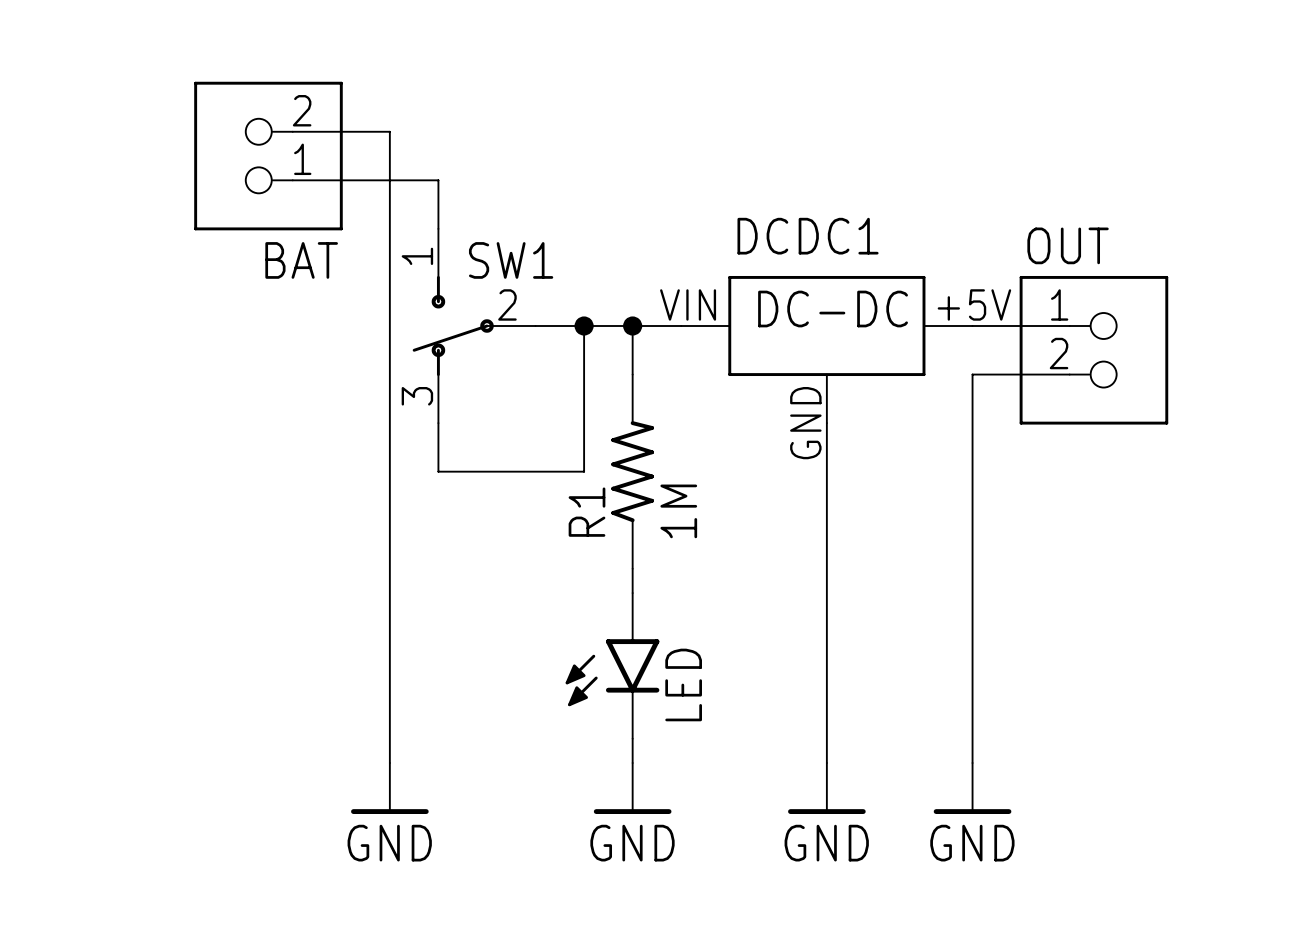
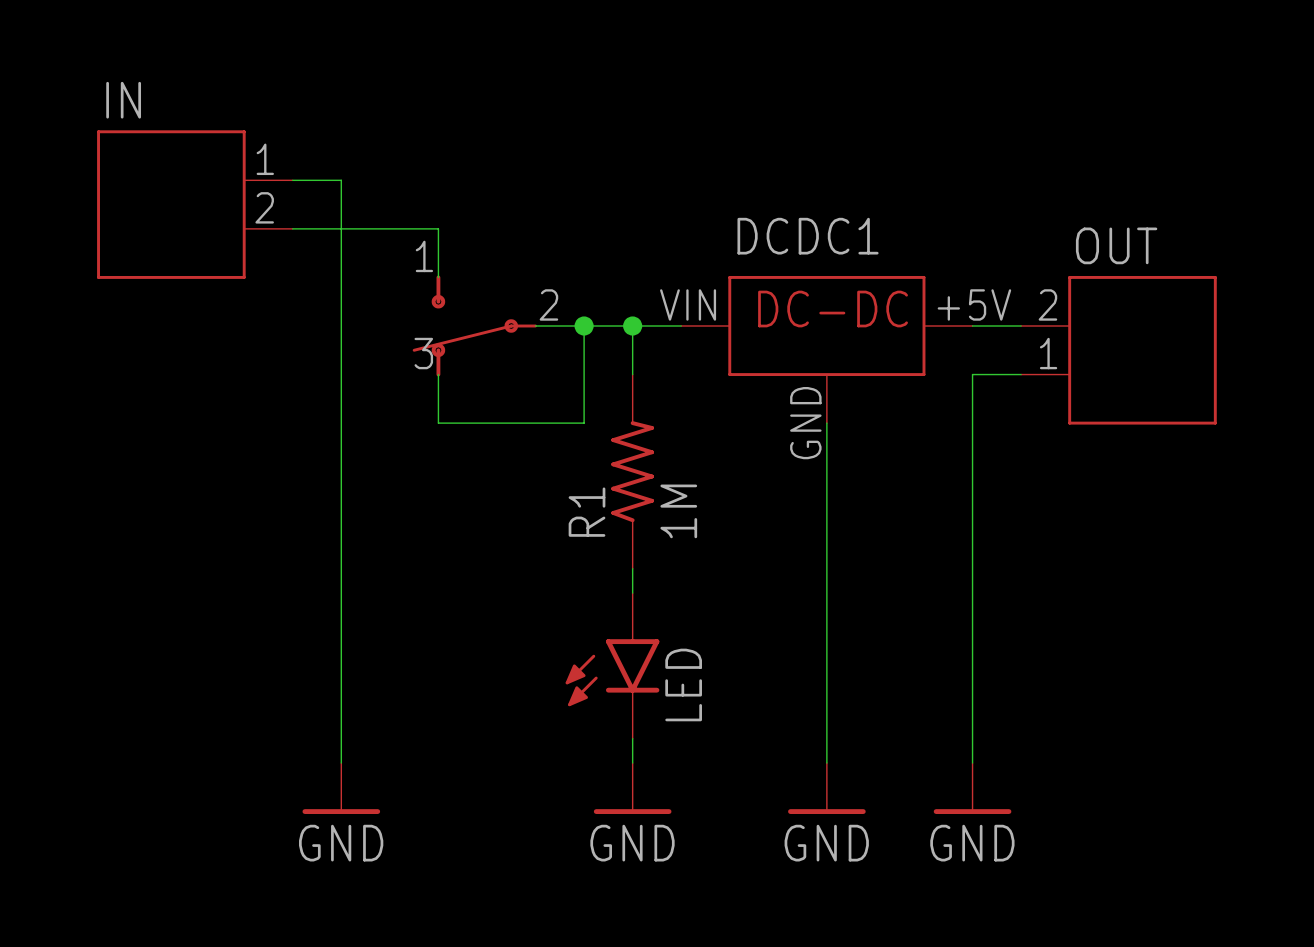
wire: (292, 131) (389, 131) (389, 763) -> none
BAT: (268, 156) -> none
wire: (341, 180) (438, 180) (438, 228) -> (341, 180) (341, 763)
IN: none -> (194, 204)
wire: none -> (292, 228) (438, 228) (438, 277)
SW1: (474, 326) -> none
part: none -> (474, 326)
OUT: (1093, 350) -> none
OUT: none -> (1118, 350)
wire: (438, 423) (438, 471) (584, 471) (584, 423) -> (438, 374) (438, 423) (584, 423)
power symbol position: GND (389, 788) -> GND (341, 788)

